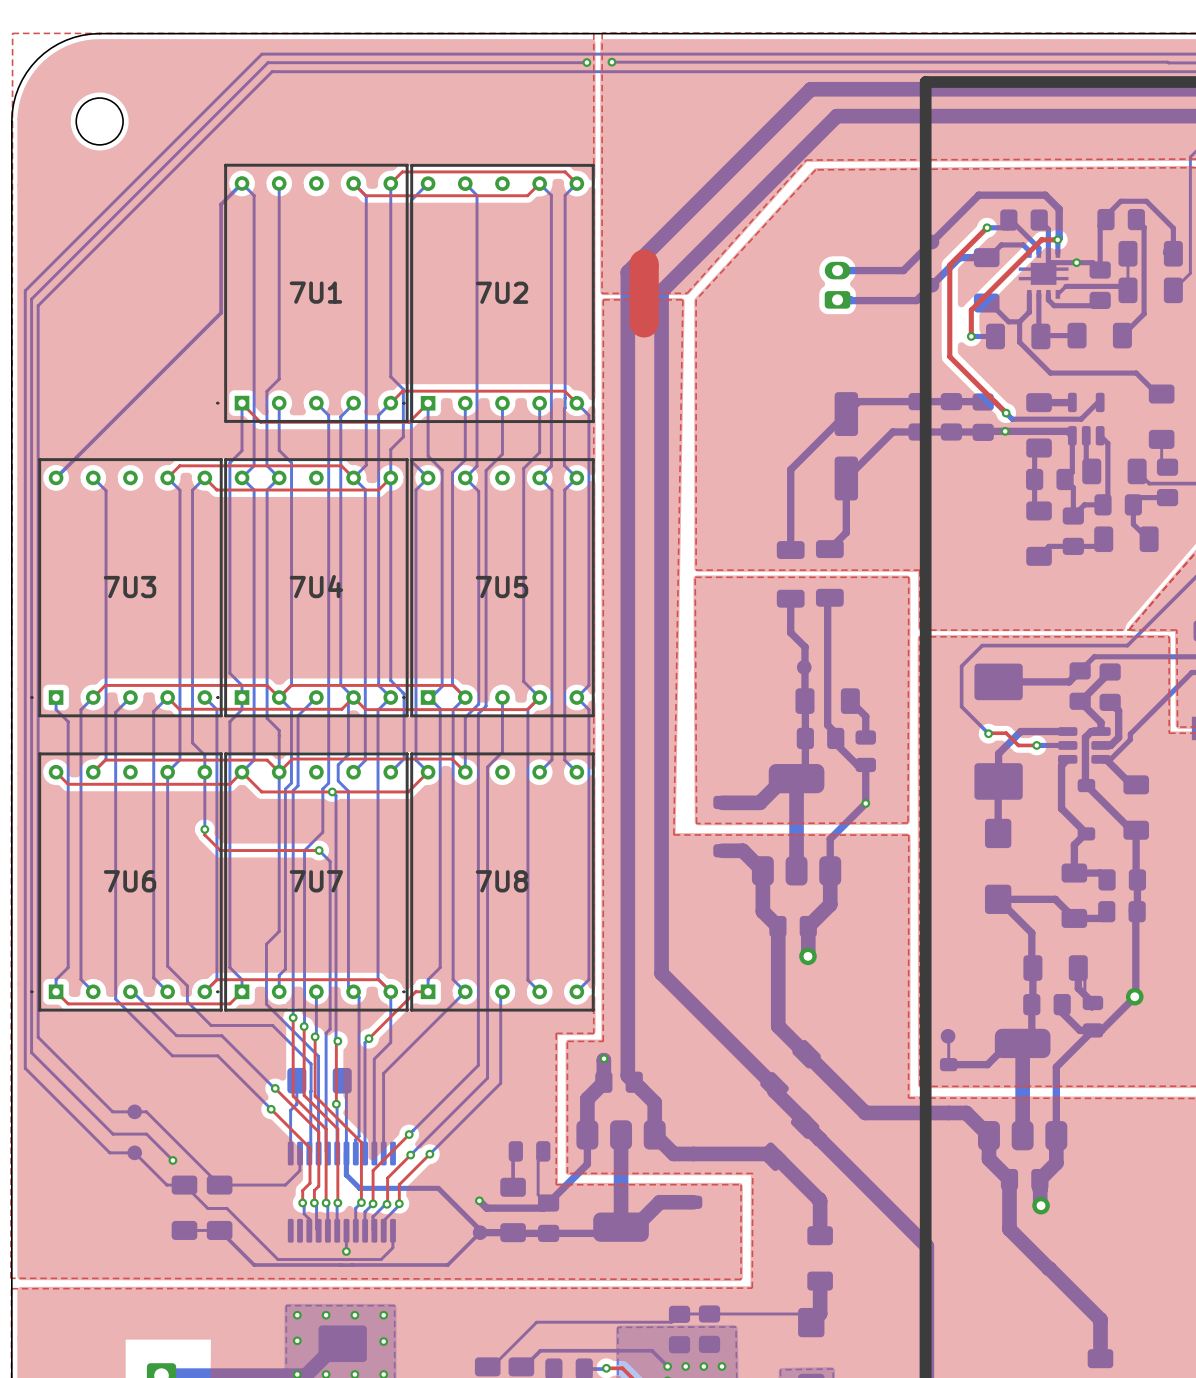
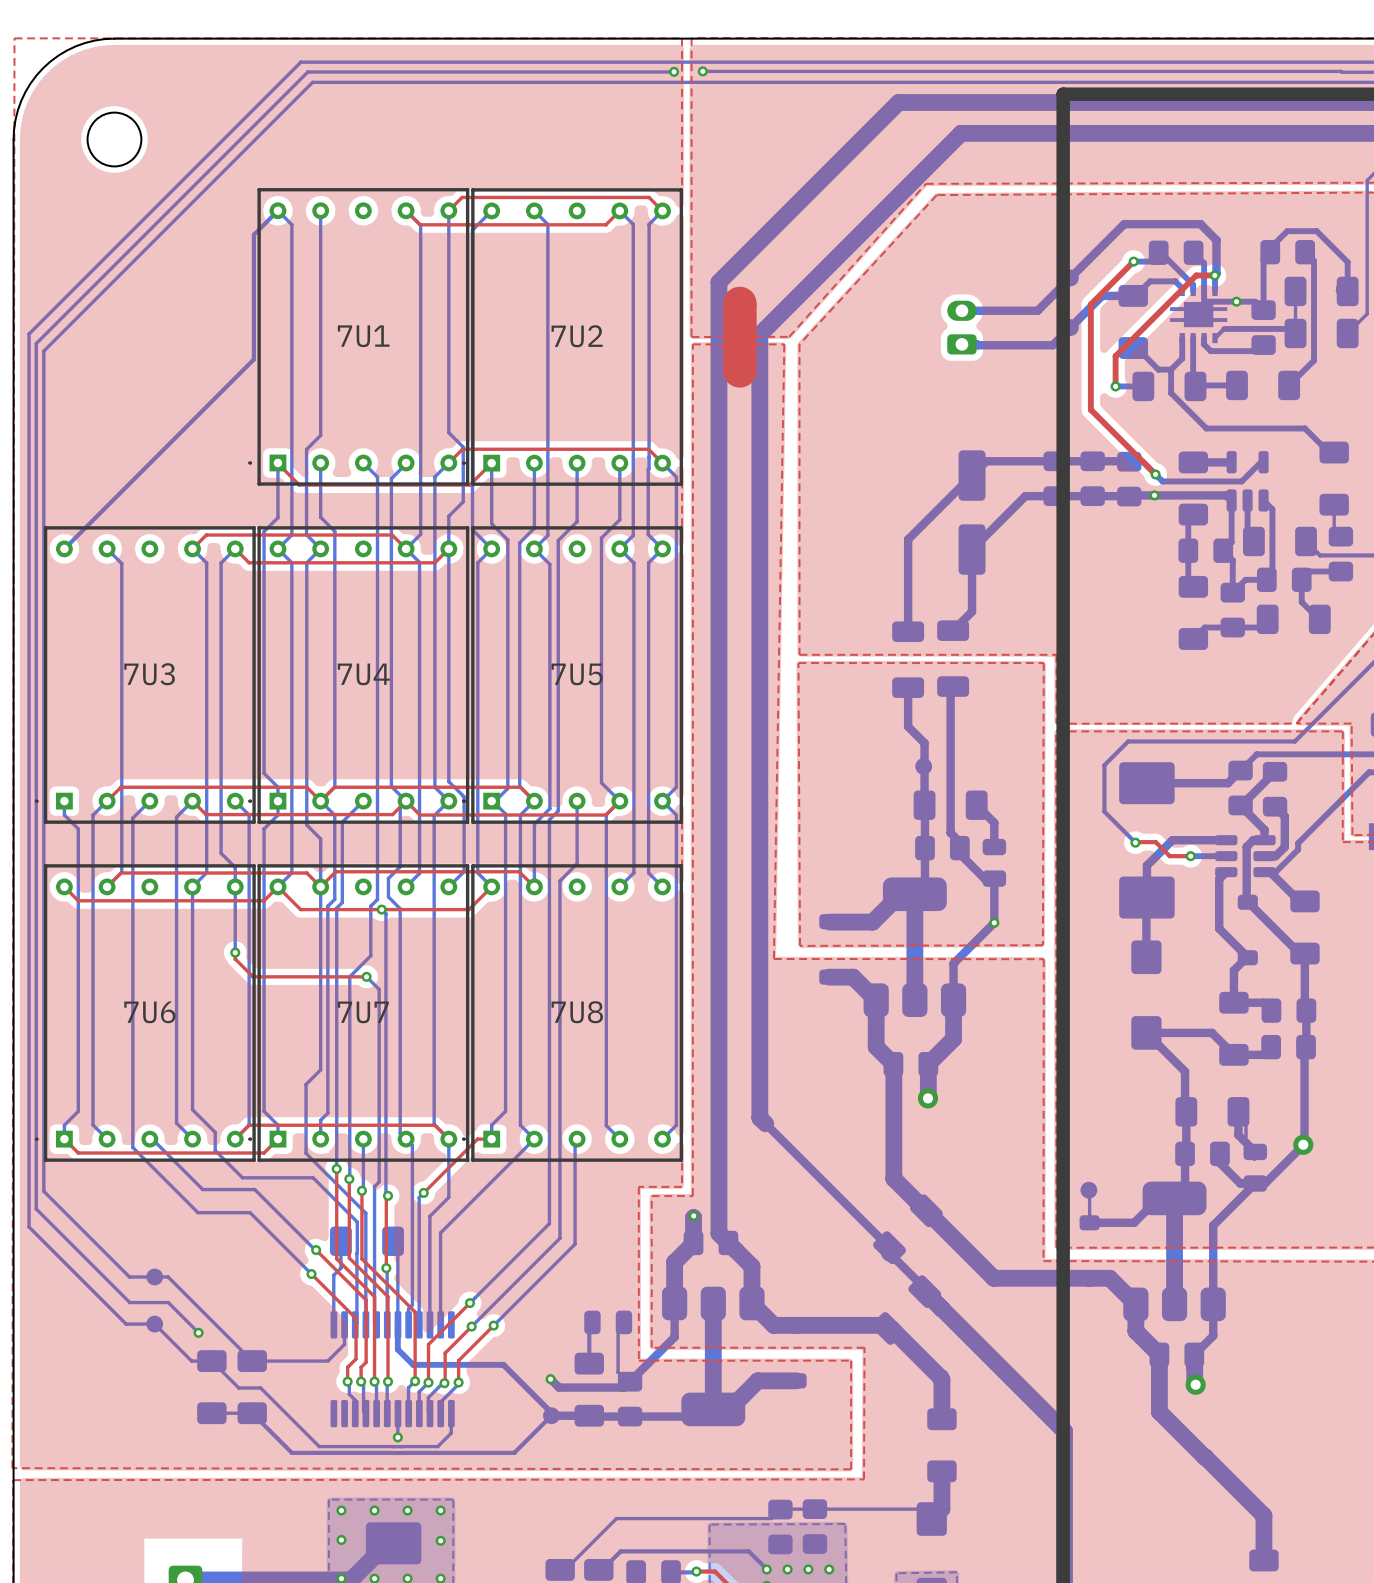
bottom track: (810, 89) (627, 272) (627, 1075) -> (931, 102) (898, 102) (718, 282) (718, 1233) (721, 1235)
bottom track width: thick (666, 978) (774, 1086) -> thin (765, 1123) (889, 1247)
bottom track width: thick (774, 1091) (805, 1121) -> thin (889, 1253) (924, 1288)
bottom track width: thick (1056, 1135) (1056, 1163) (1039, 1179) -> thin (1213, 1304) (1213, 1335) (1194, 1354)

